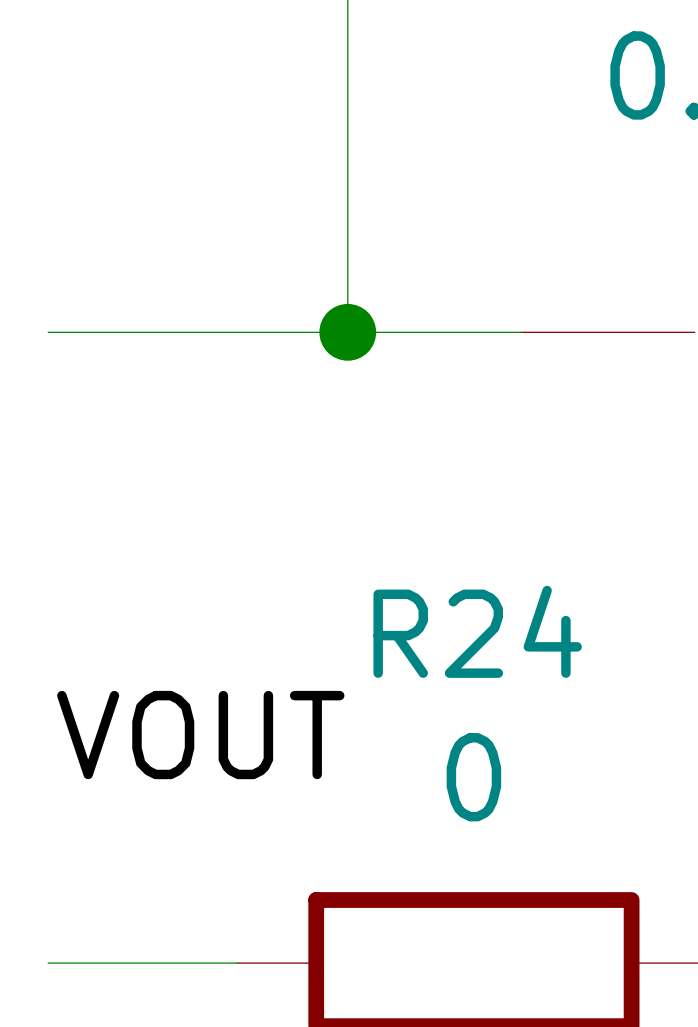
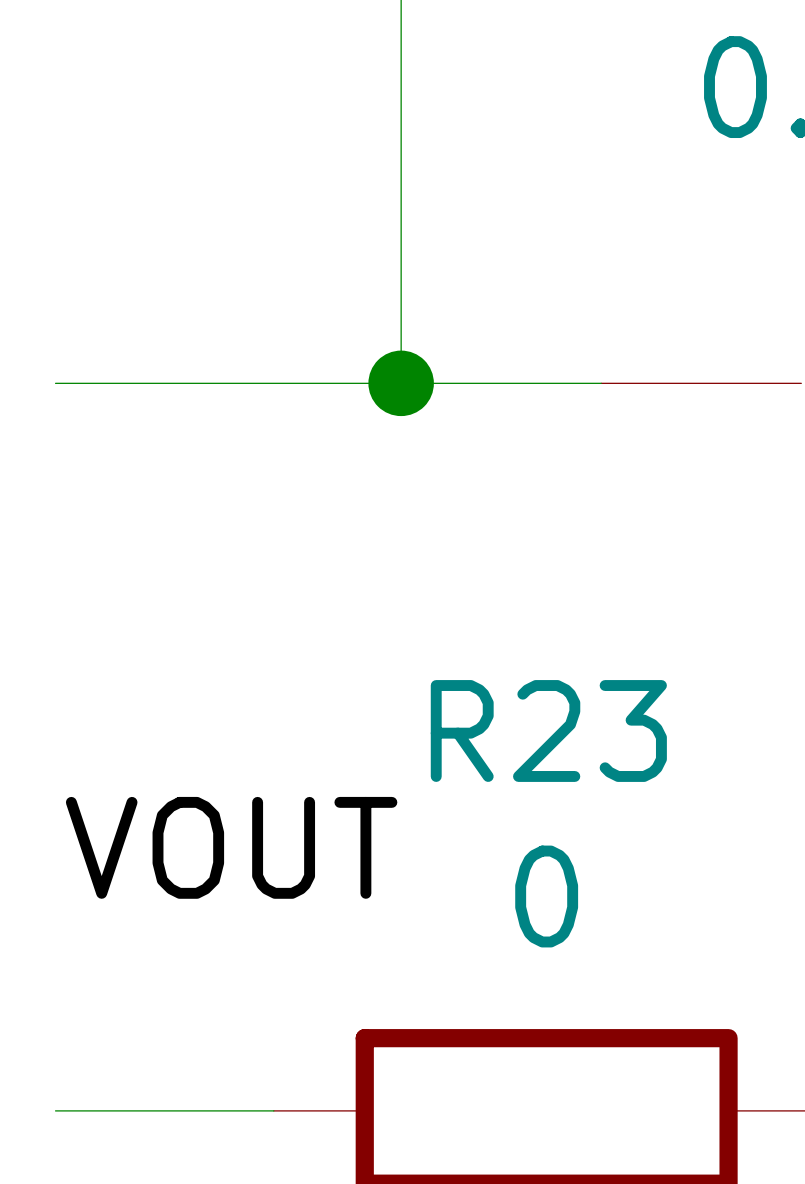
R24 name: R24 (477, 631) -> R23 (548, 730)

